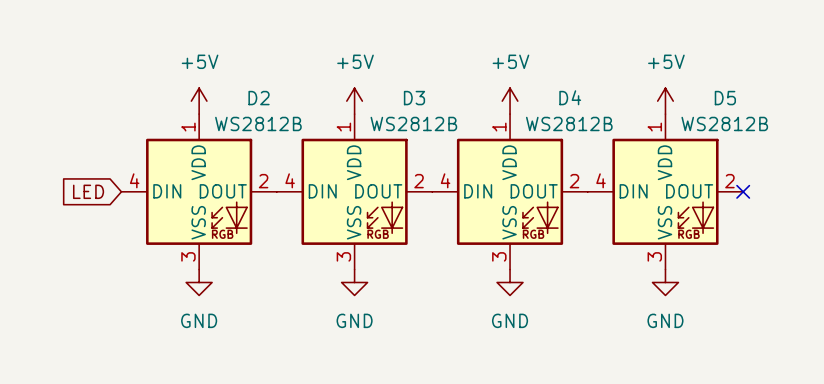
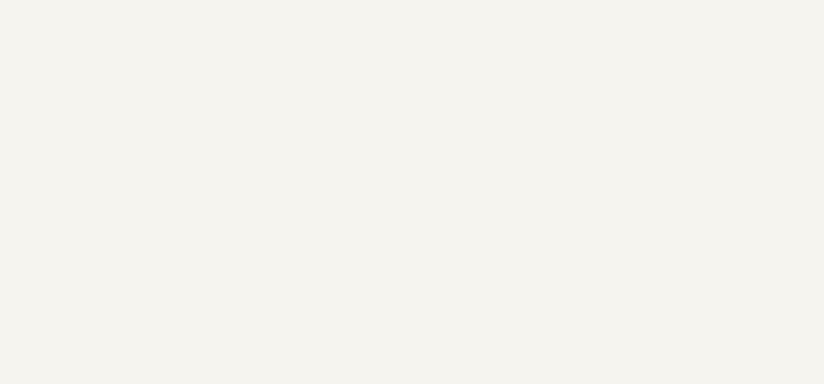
power symbol: +5V (199, 101) -> none
power symbol: +5V (354, 101) -> none
power symbol: +5V (510, 101) -> none
power symbol: +5V (665, 101) -> none
global label: LED (88, 191) -> none
D2: WS2812B (199, 191) -> none
D3: WS2812B (354, 191) -> none
D4: WS2812B (510, 191) -> none
D5: WS2812B (665, 191) -> none
no-connect mark: (743, 191) -> none
power symbol: GND (199, 282) -> none
power symbol: GND (354, 282) -> none
power symbol: GND (510, 282) -> none
power symbol: GND (665, 282) -> none

